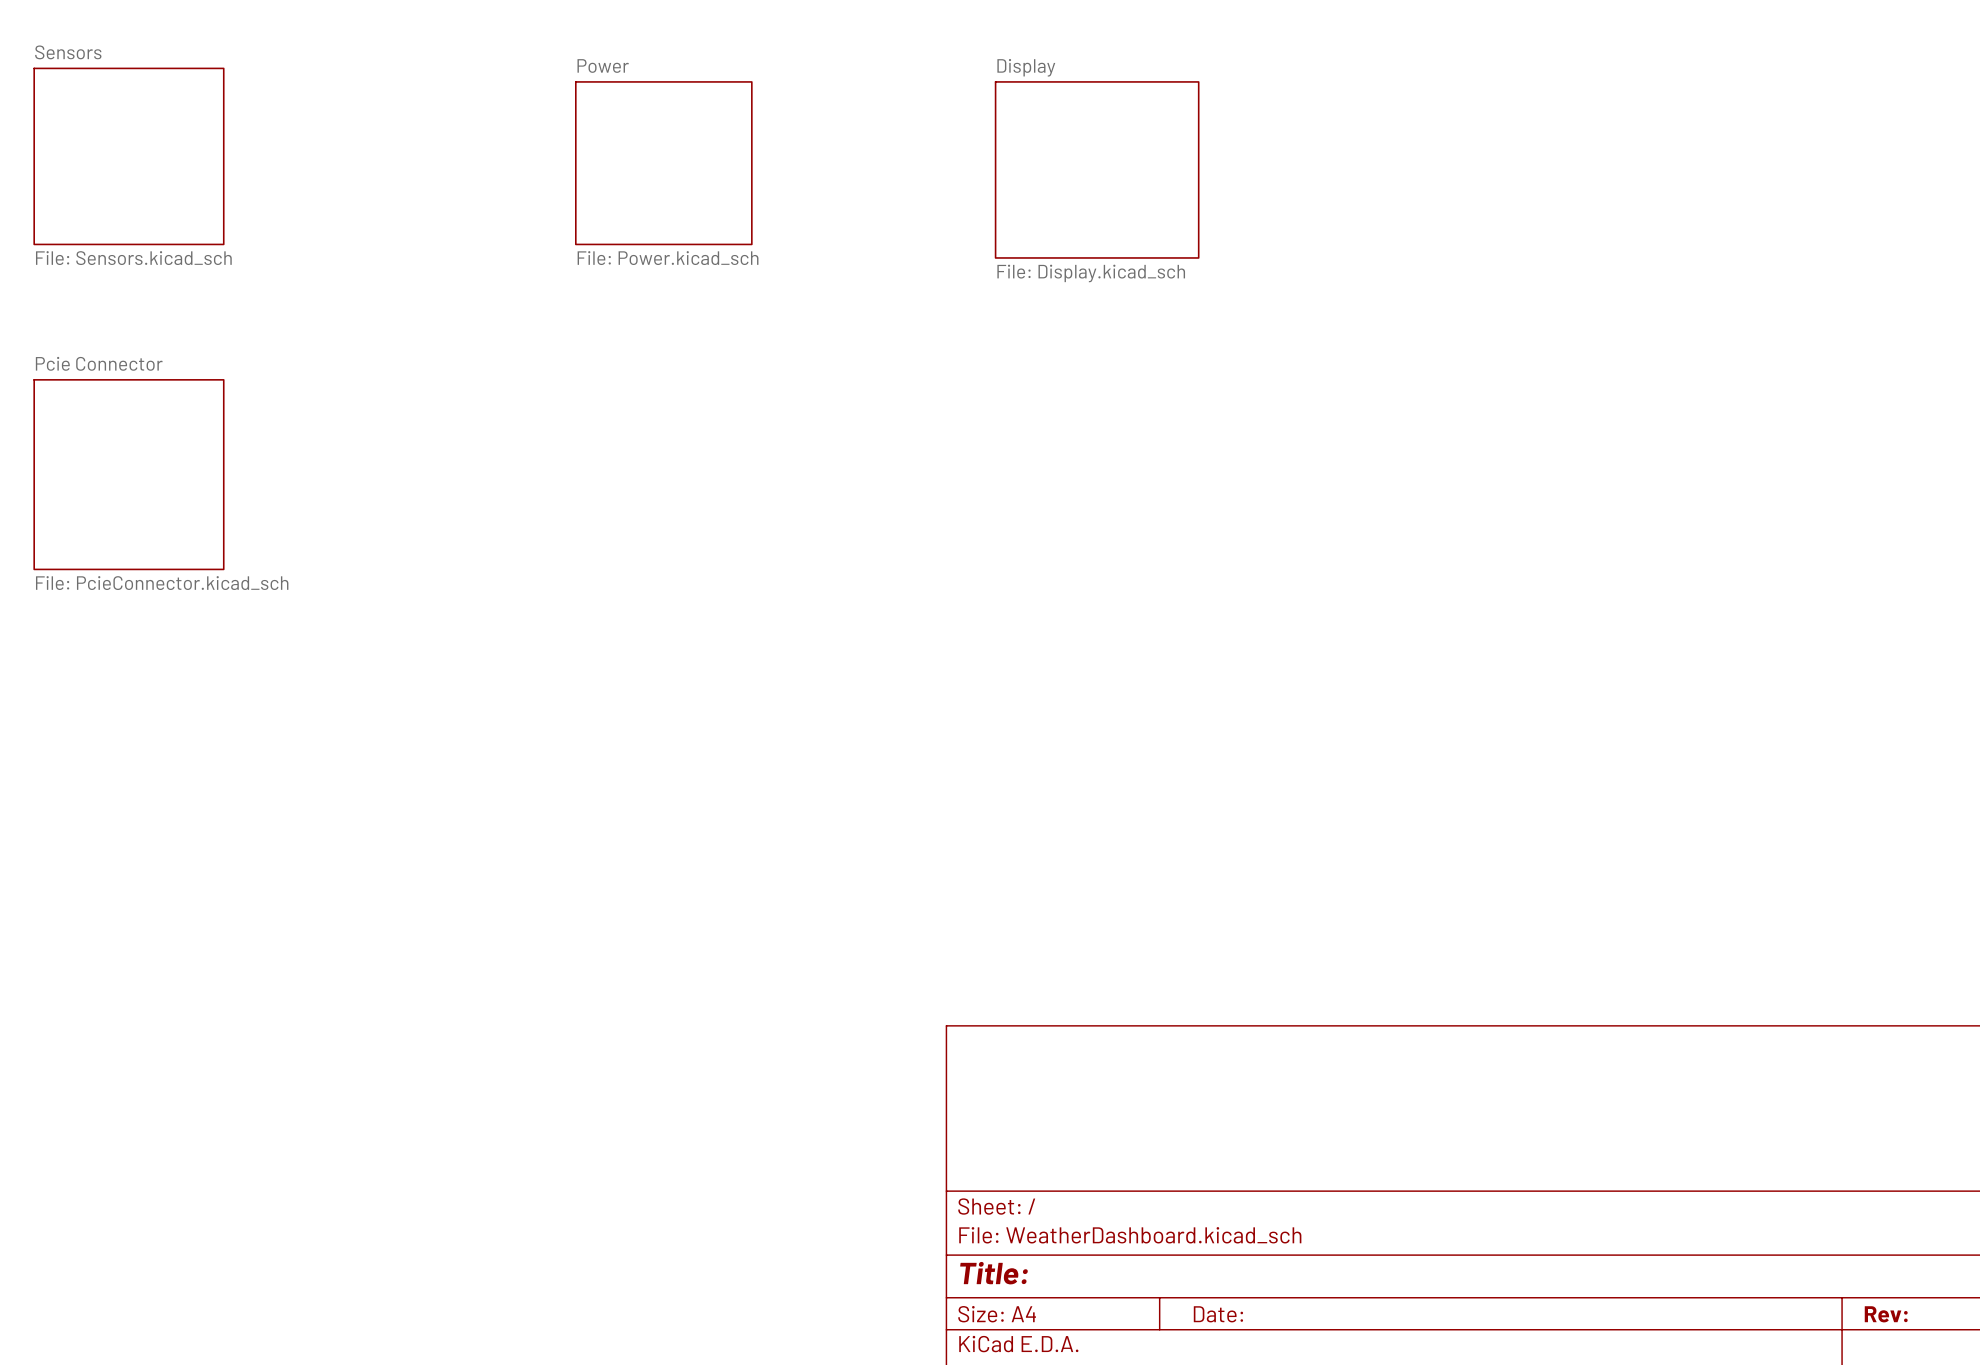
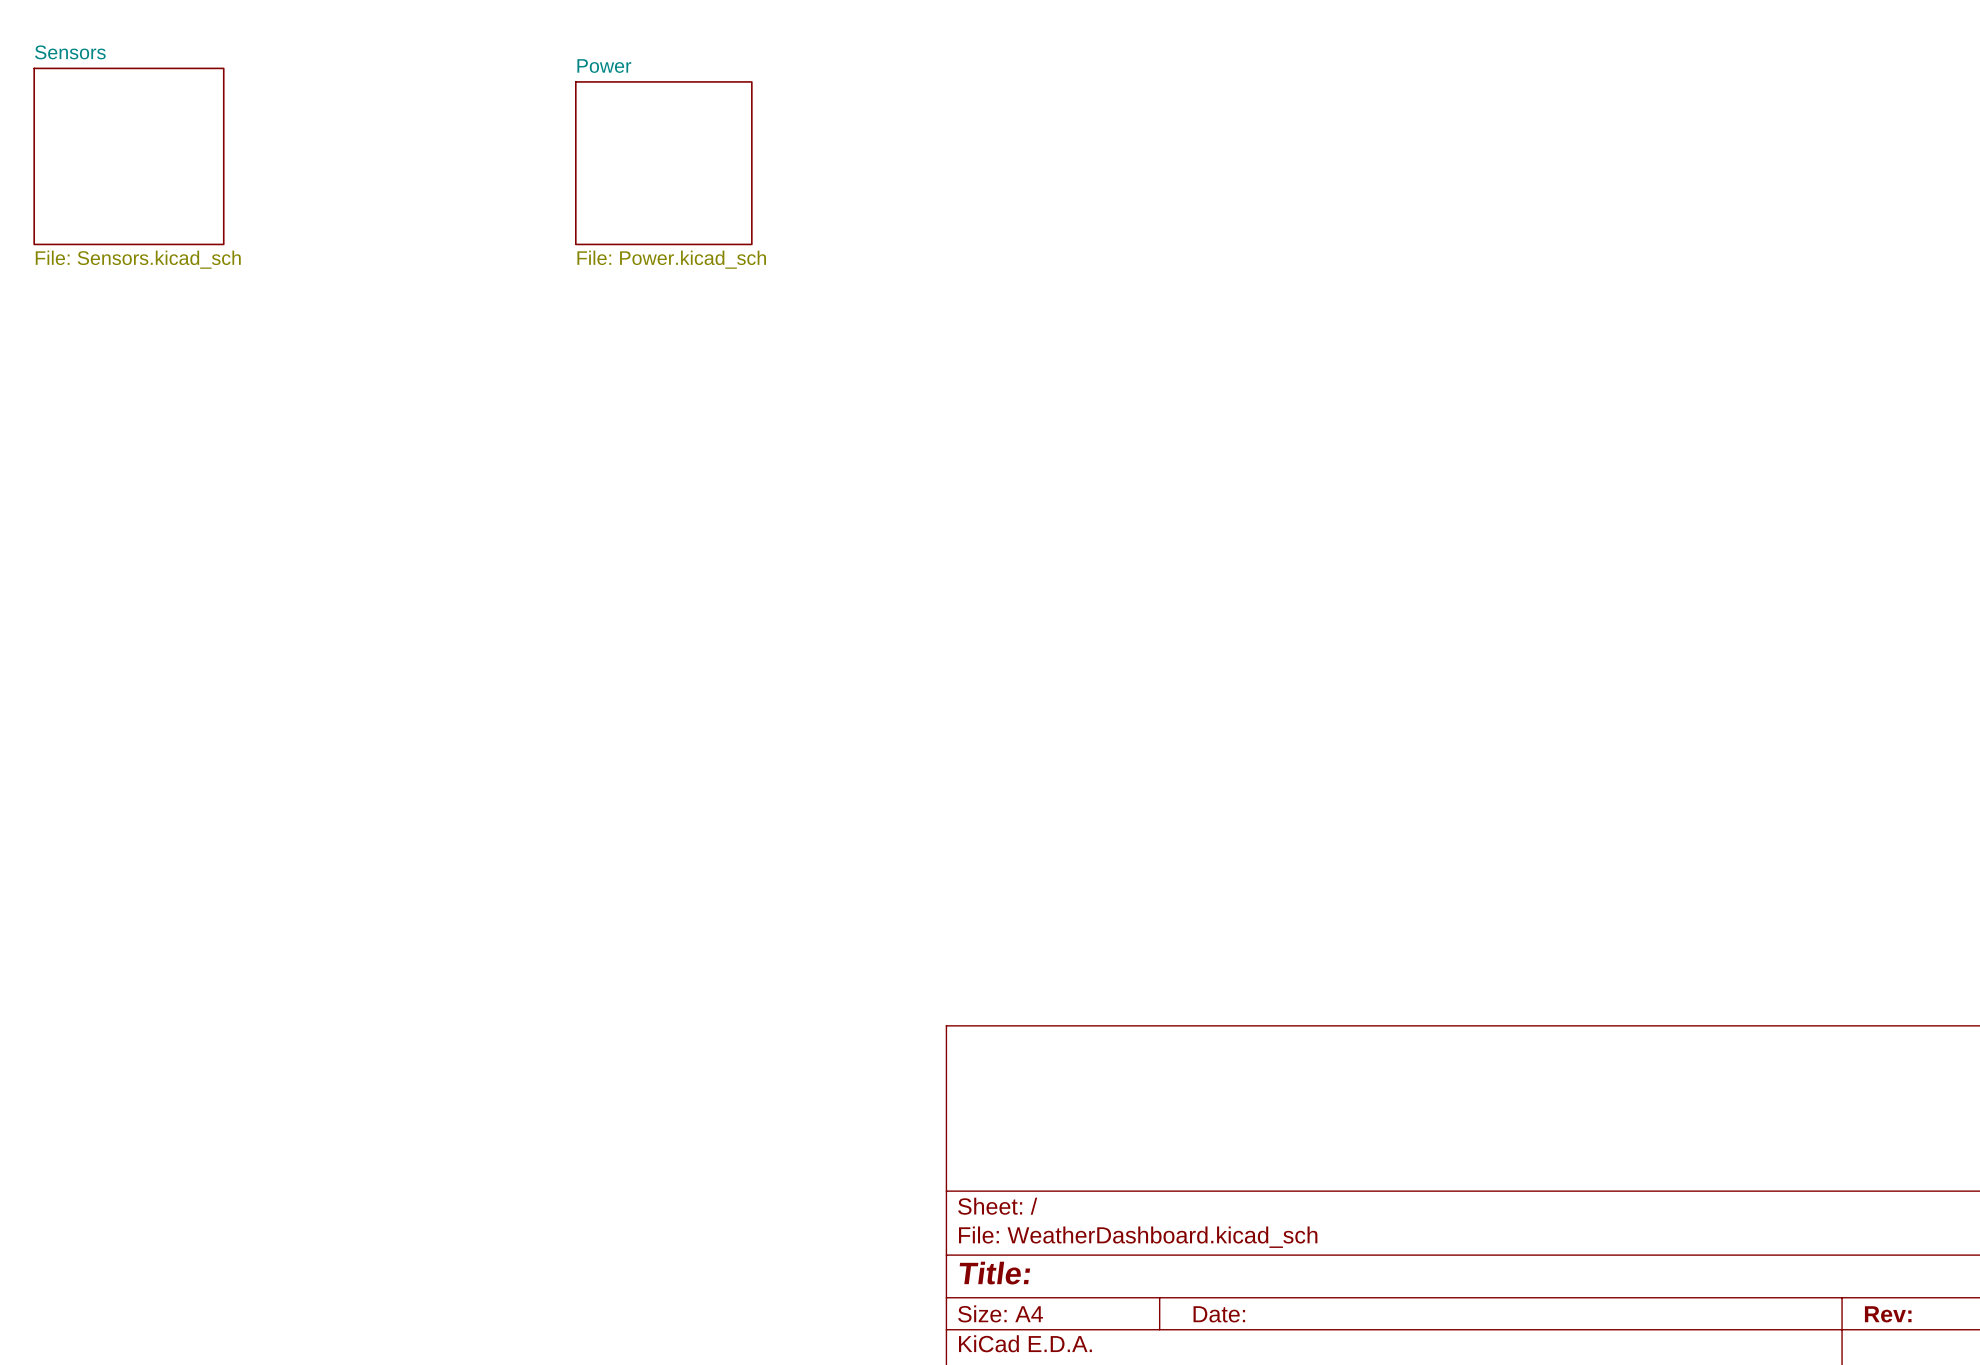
sheet Display: File: Display.kicad_sch (1097, 169) -> none
sheet Pcie Connector: File: PcieConnector.kicad_sch (128, 474) -> none

